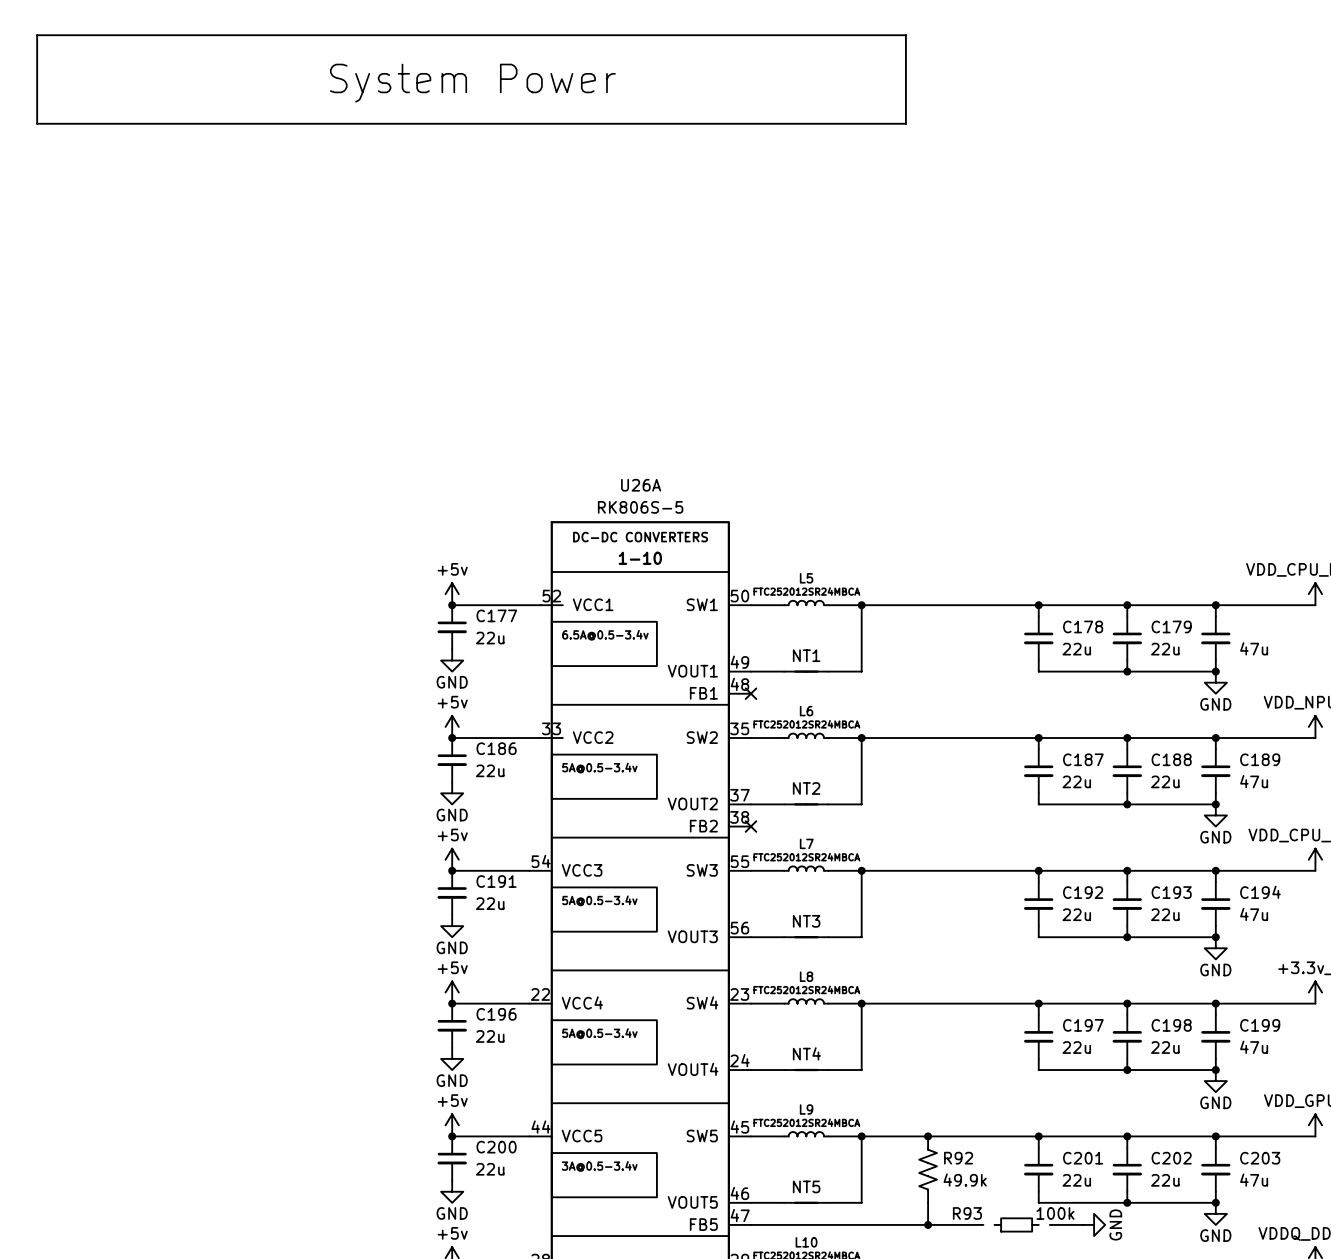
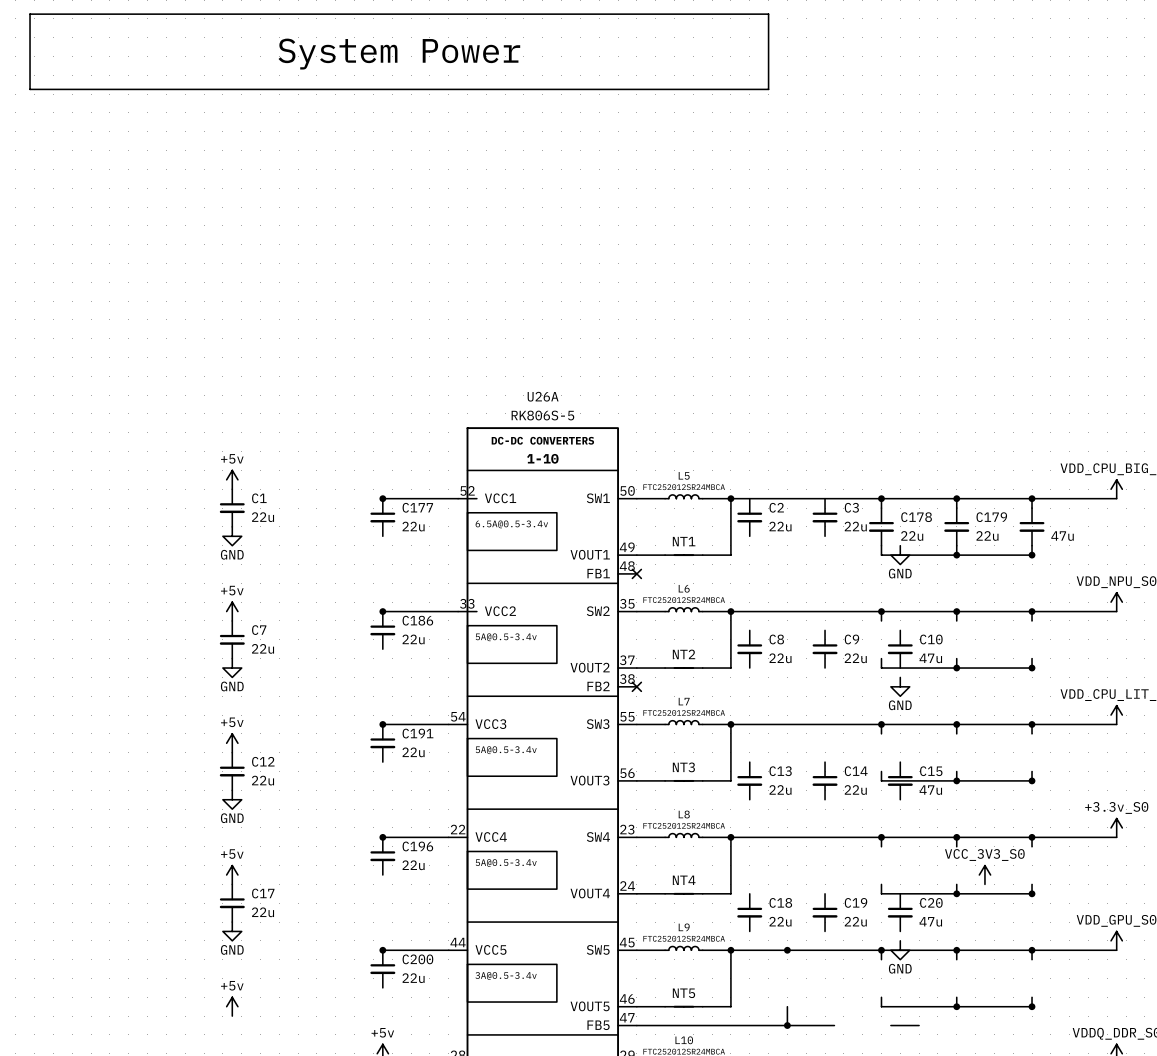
power symbol: none -> +5v (232, 479)
power symbol: +5v (452, 594) -> none
C1: none -> 22u (232, 508)
C2: none -> 22u (749, 517)
C3: none -> 22u (825, 517)
power symbol: none -> GND (232, 536)
power symbol: GND (452, 660) -> none
power symbol: none -> GND (900, 555)
power symbol: GND (1215, 682) -> none
power symbol: +5v (452, 726) -> none
power symbol: none -> +5v (232, 611)
C7: none -> 22u (232, 639)
C187: 22u (1038, 771) -> none
C188: 22u (1127, 771) -> none
C189: 47u (1215, 771) -> none
C8: none -> 22u (749, 649)
C9: none -> 22u (825, 649)
C10: none -> 47u (900, 649)
power symbol: GND (452, 793) -> none
power symbol: none -> GND (232, 668)
power symbol: GND (1215, 815) -> none
power symbol: none -> GND (900, 686)
power symbol: +5v (452, 859) -> none
power symbol: none -> +5v (232, 743)
C192: 22u (1038, 904) -> none
C193: 22u (1127, 904) -> none
C194: 47u (1215, 904) -> none
C12: none -> 22u (232, 771)
power symbol: GND (452, 926) -> none
C13: none -> 22u (749, 780)
C14: none -> 22u (825, 780)
C15: none -> 47u (900, 780)
power symbol: GND (1215, 948) -> none
power symbol: none -> GND (232, 799)
power symbol: +5v (452, 992) -> none
C197: 22u (1038, 1036) -> none
C198: 22u (1127, 1036) -> none
C199: 47u (1215, 1036) -> none
power symbol: none -> +5v (232, 875)
power symbol: none -> VCC_3V3_S0 (984, 875)
power symbol: GND (452, 1058) -> none
C17: none -> 22u (232, 903)
power symbol: GND (1215, 1081) -> none
C18: none -> 22u (749, 912)
C19: none -> 22u (825, 912)
C20: none -> 47u (900, 912)
power symbol: none -> GND (232, 931)
power symbol: +5v (452, 1125) -> none
power symbol: none -> GND (900, 950)
R92: 49.9k (928, 1169) -> none
C201: 22u (1038, 1169) -> none
C202: 22u (1127, 1169) -> none
C203: 47u (1215, 1169) -> none
power symbol: GND (452, 1191) -> none
power symbol: none -> +5v (232, 1006)
power symbol: GND (1215, 1213) -> none
R93: 100k (1016, 1224) -> none
power symbol: GND (1094, 1224) -> none

